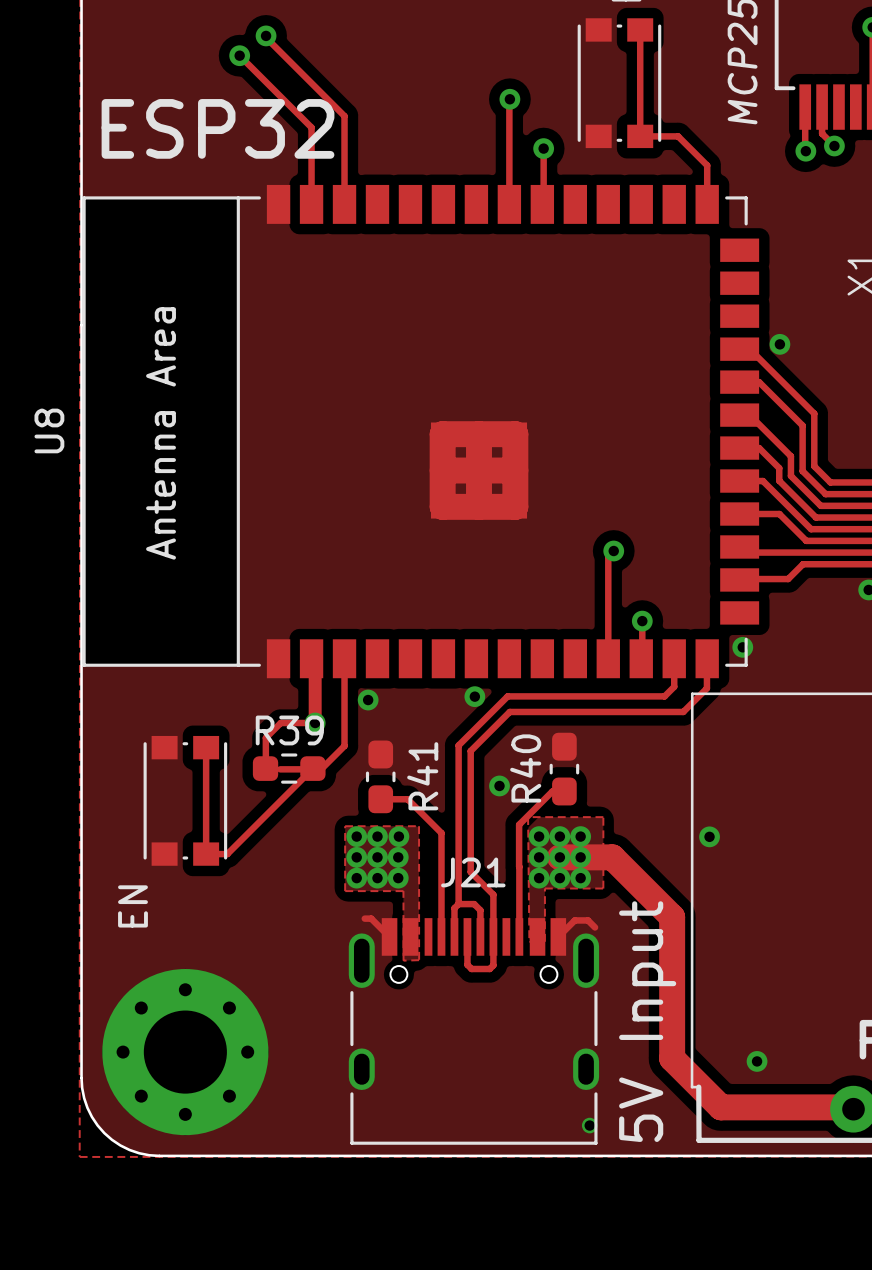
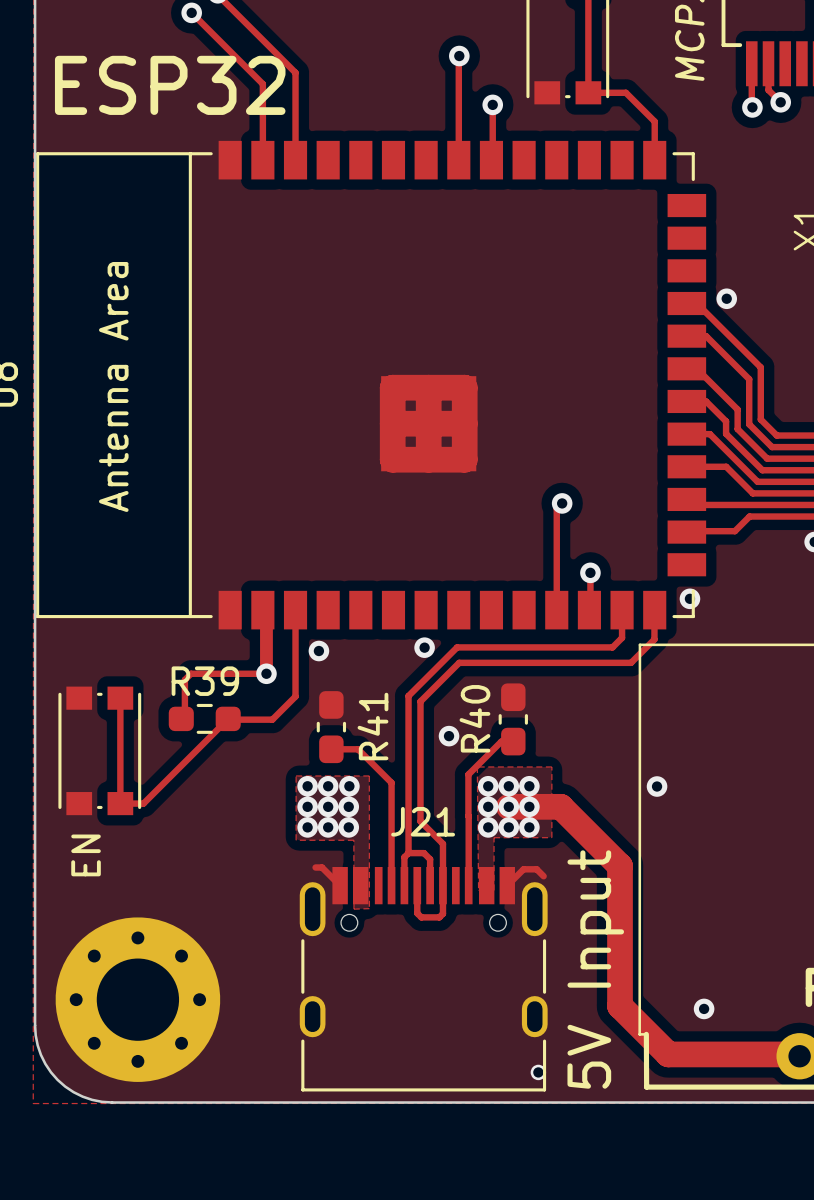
track: (280, 723) (265, 737) (265, 768) -> (232, 673) (191, 673) (184, 679) (184, 719)
track: none -> (120, 698) (120, 803) (143, 803) (228, 718)
track: (206, 747) (206, 854) (227, 854) (312, 768) -> none
R39 position: (289, 768) -> (204, 718)
part position: (185, 800) -> (99, 750)

